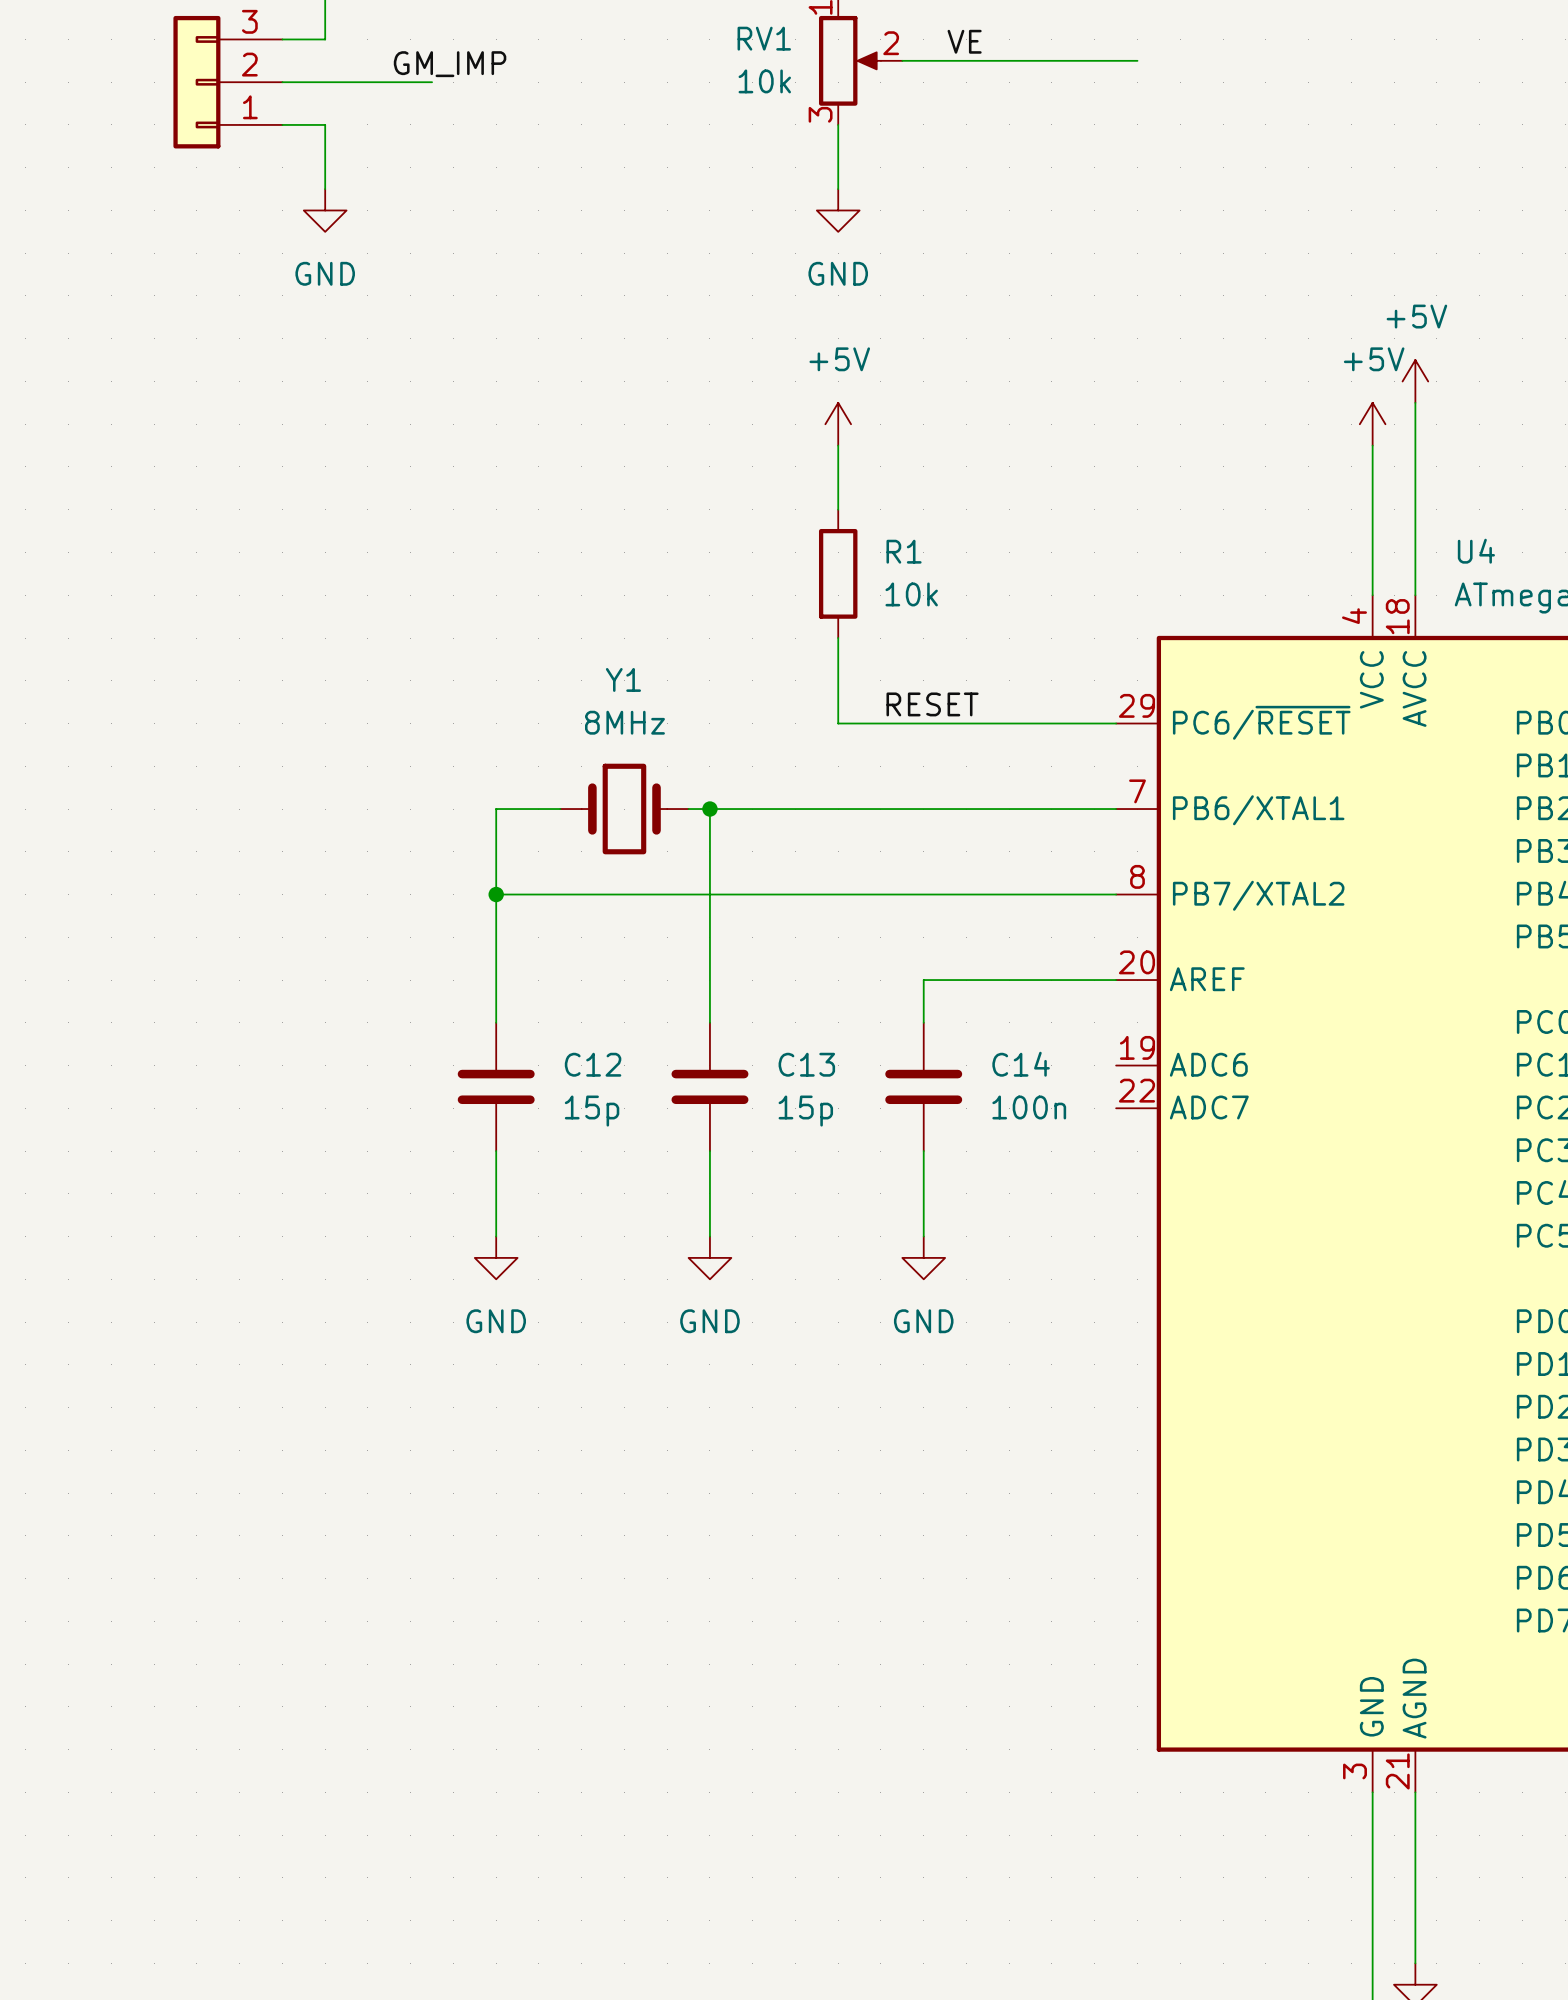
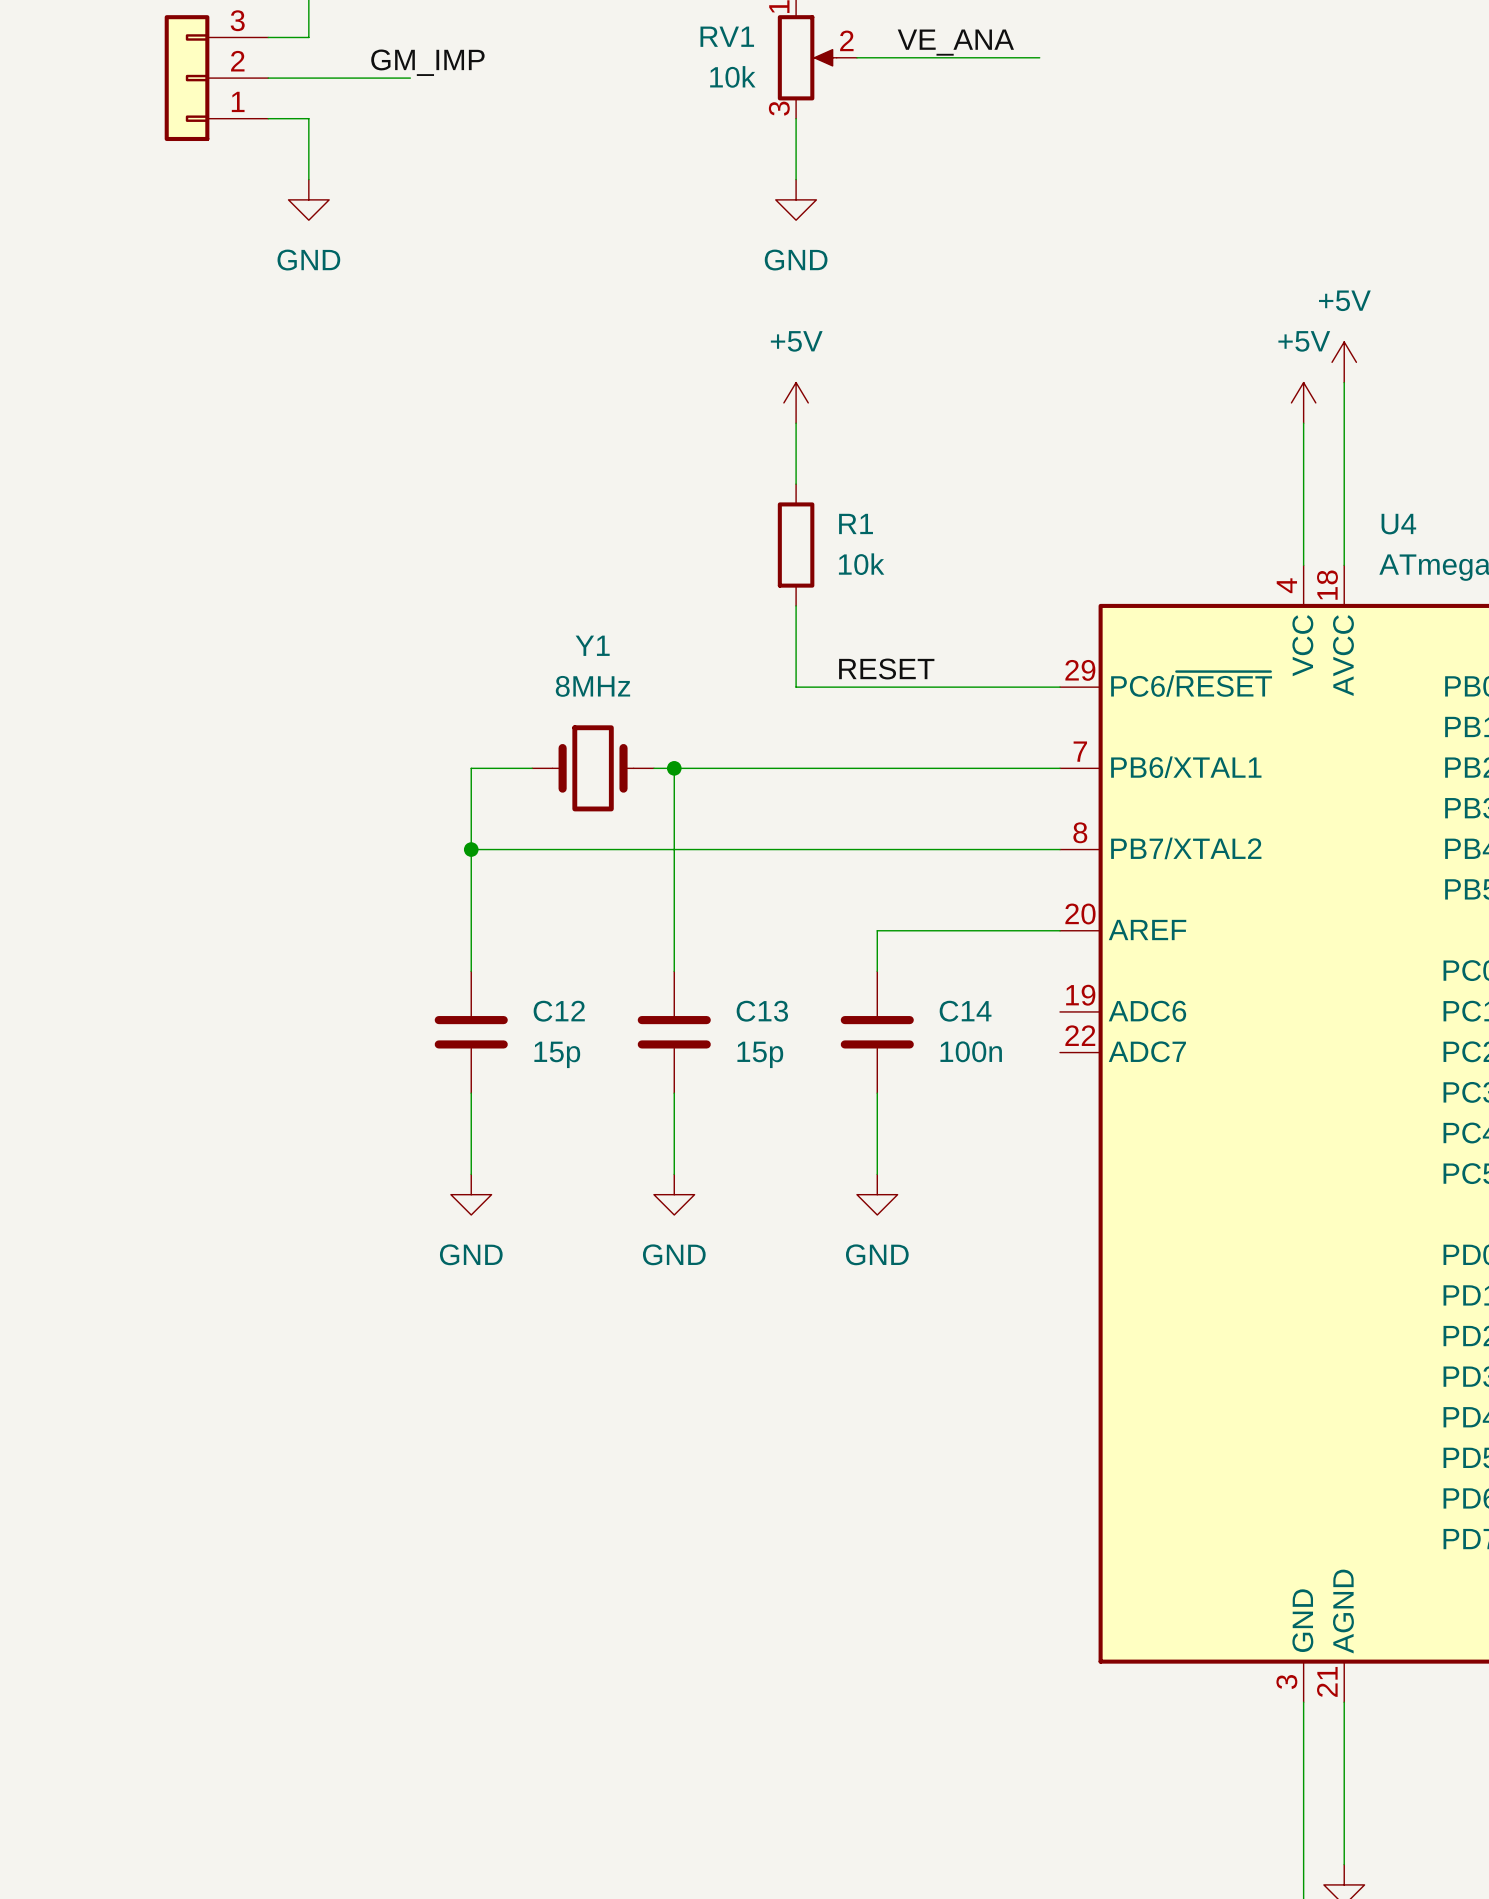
label: VE (964, 41) -> VE_ANA (955, 42)
wire: (1094, 60) (1137, 60) -> none

